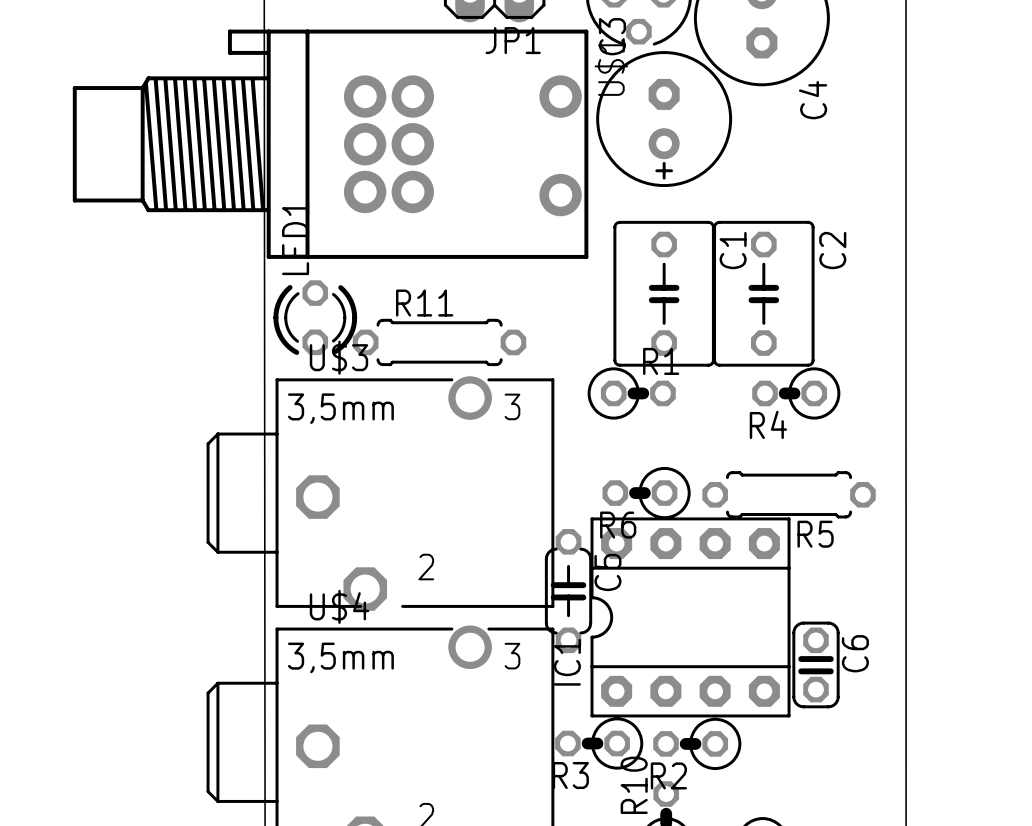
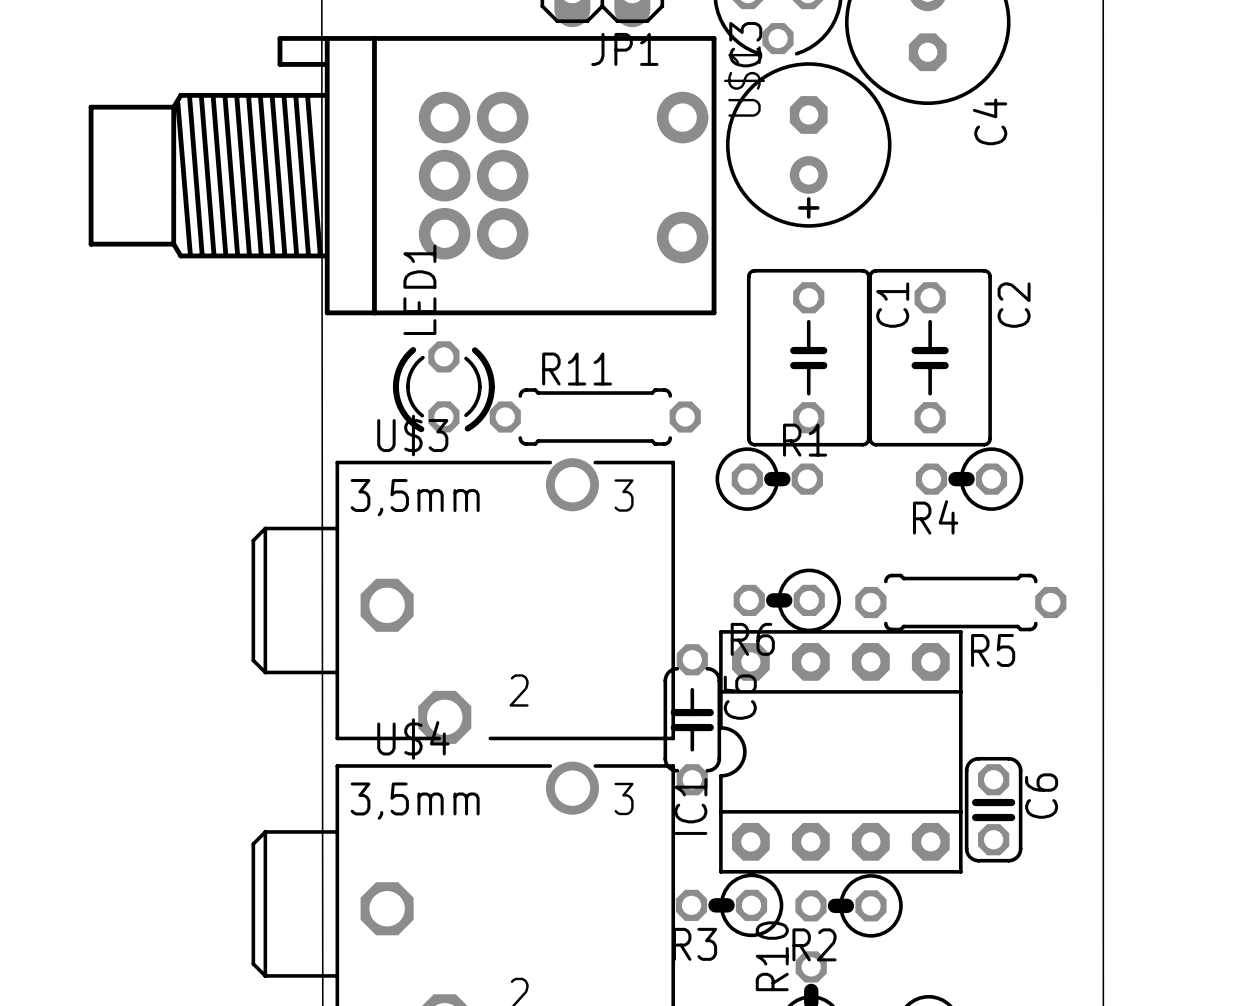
LED1 position: (315, 317) -> (443, 386)
R11 position: (439, 342) -> (595, 417)

